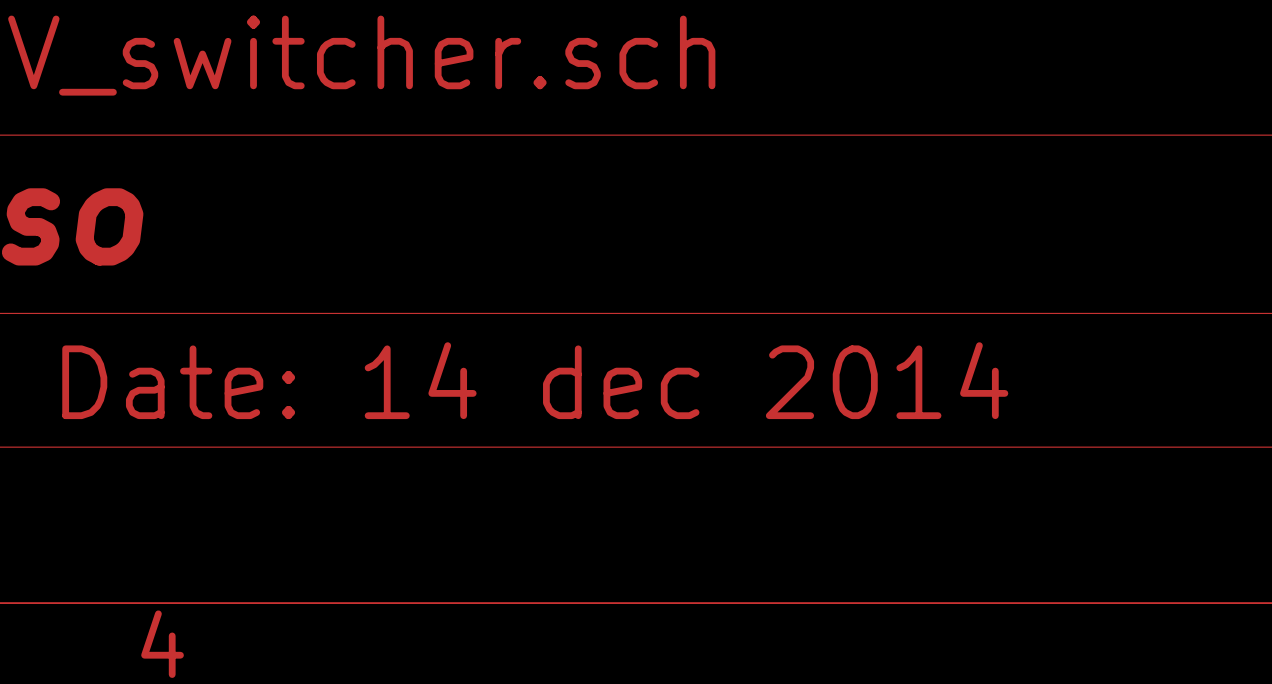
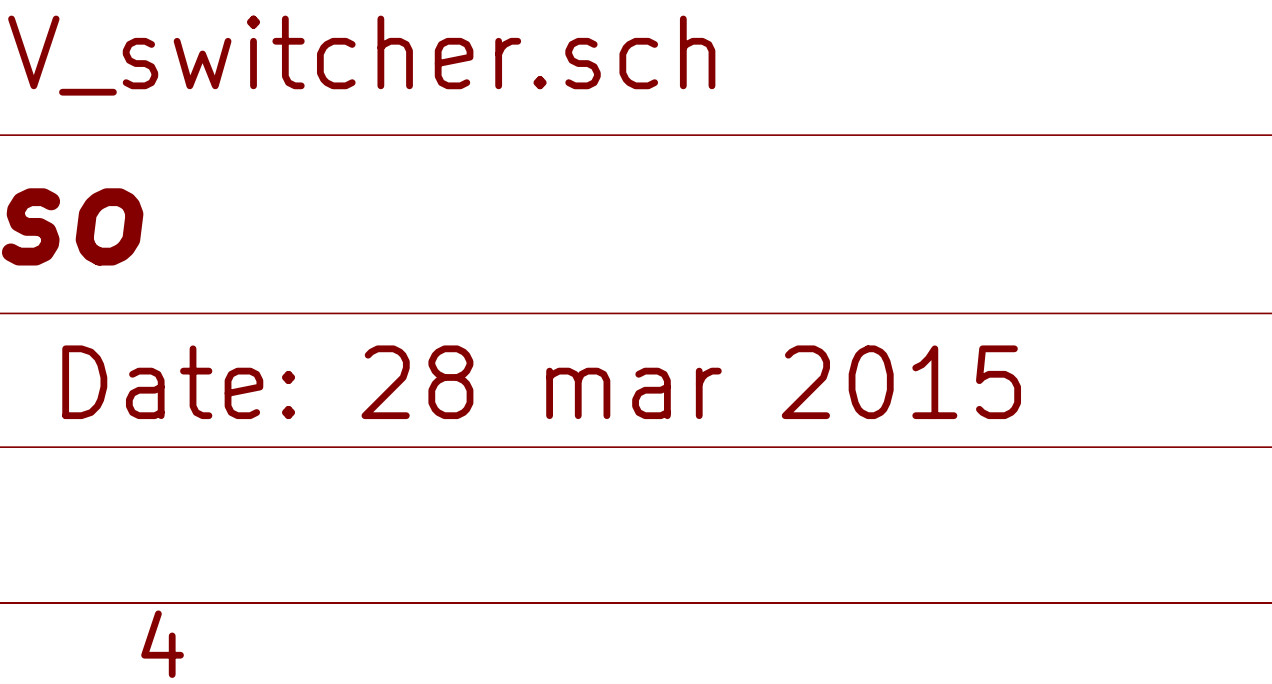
title block: Date: 14 dec 2014 (535, 380) -> Date: 28 mar 2015 (541, 382)

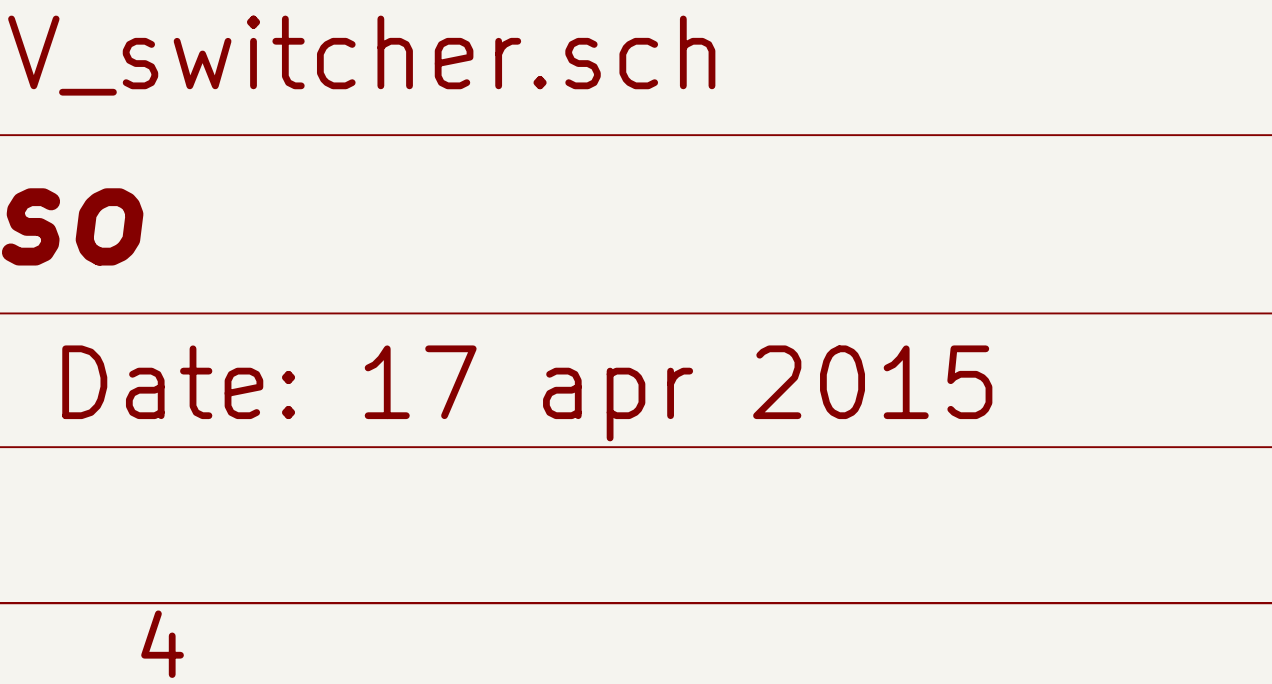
title block: Date: 28 mar 2015 (541, 382) -> Date: 17 apr 2015 (527, 393)

